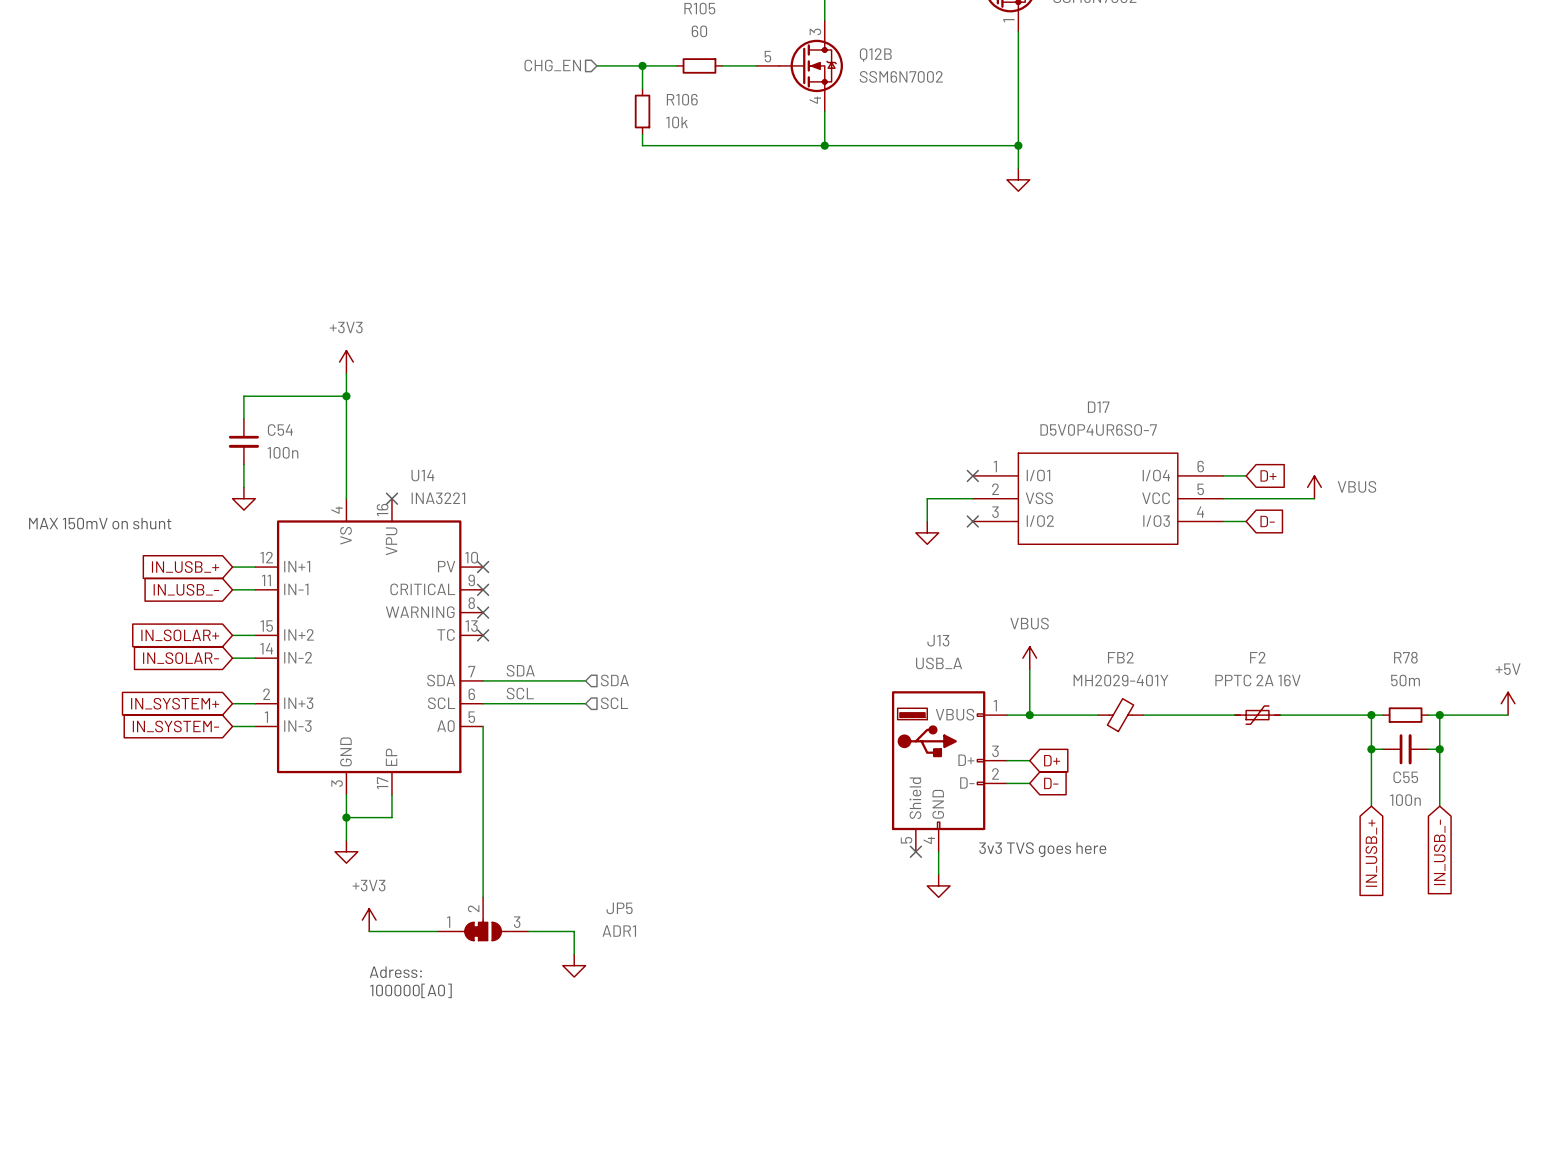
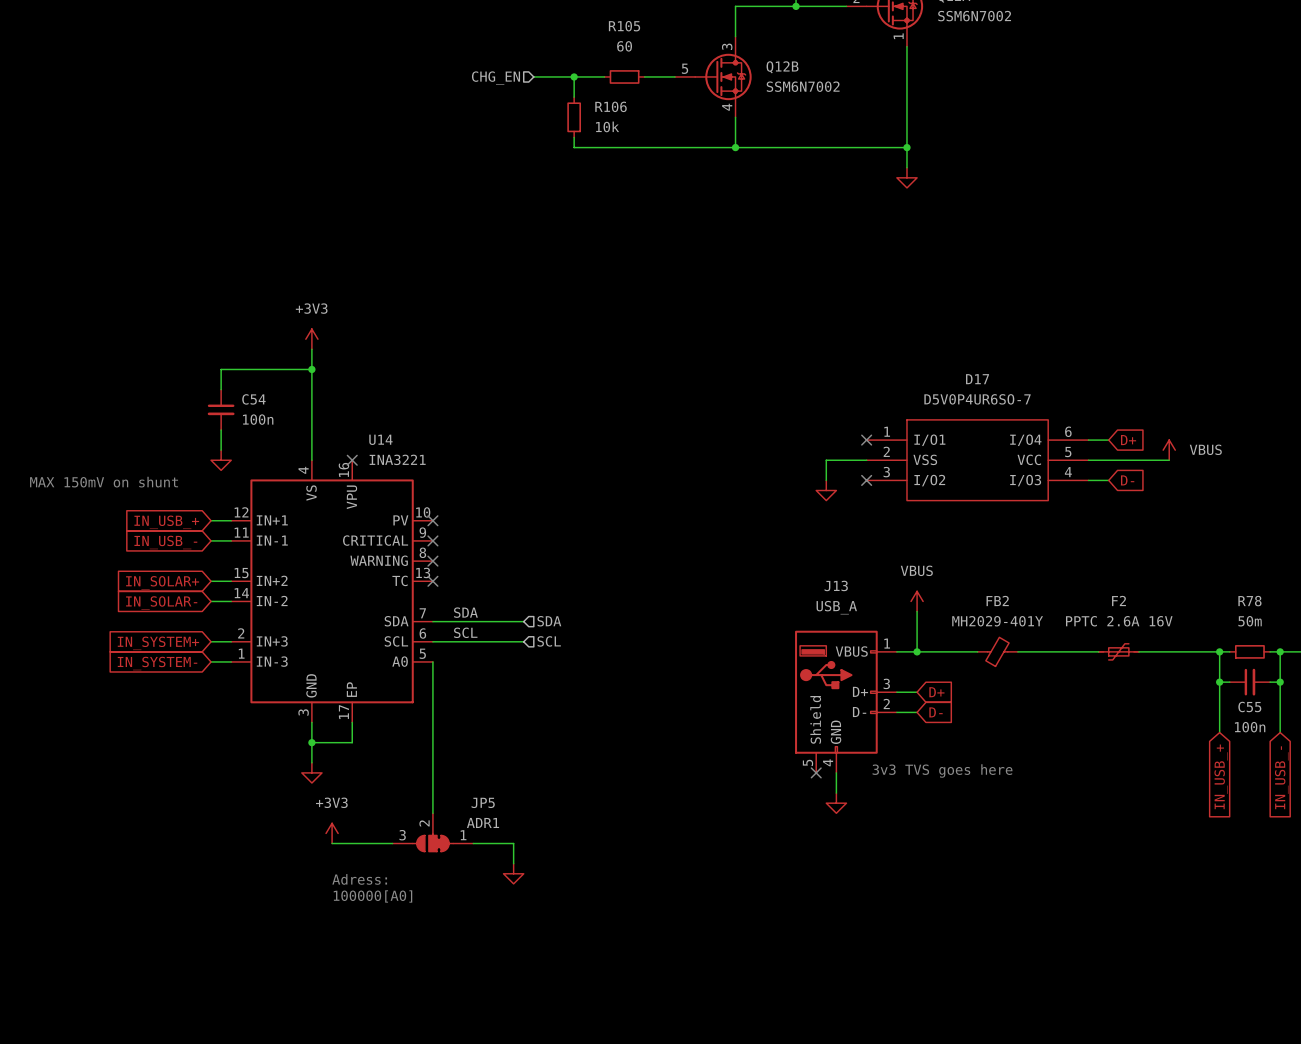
F2 value: PPTC 2A 16V (1257, 680) -> PPTC 2.6A 16V (1119, 621)
JP5 name position: JP5 (619, 908) -> JP5 (483, 802)
JP5 flip: as is (483, 930) -> left-right (432, 842)
JP5 value position: ADR1 (619, 931) -> ADR1 (483, 822)

